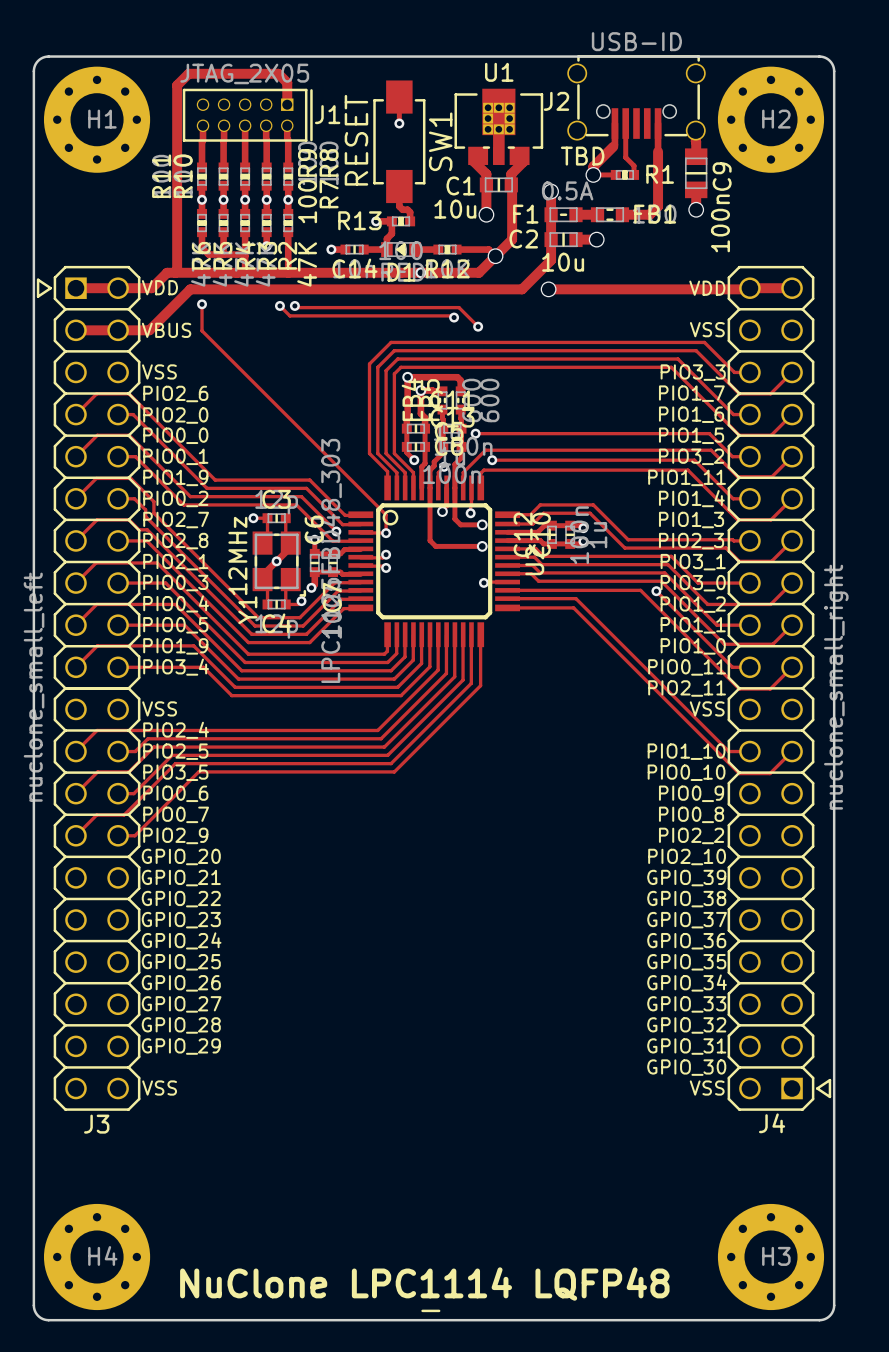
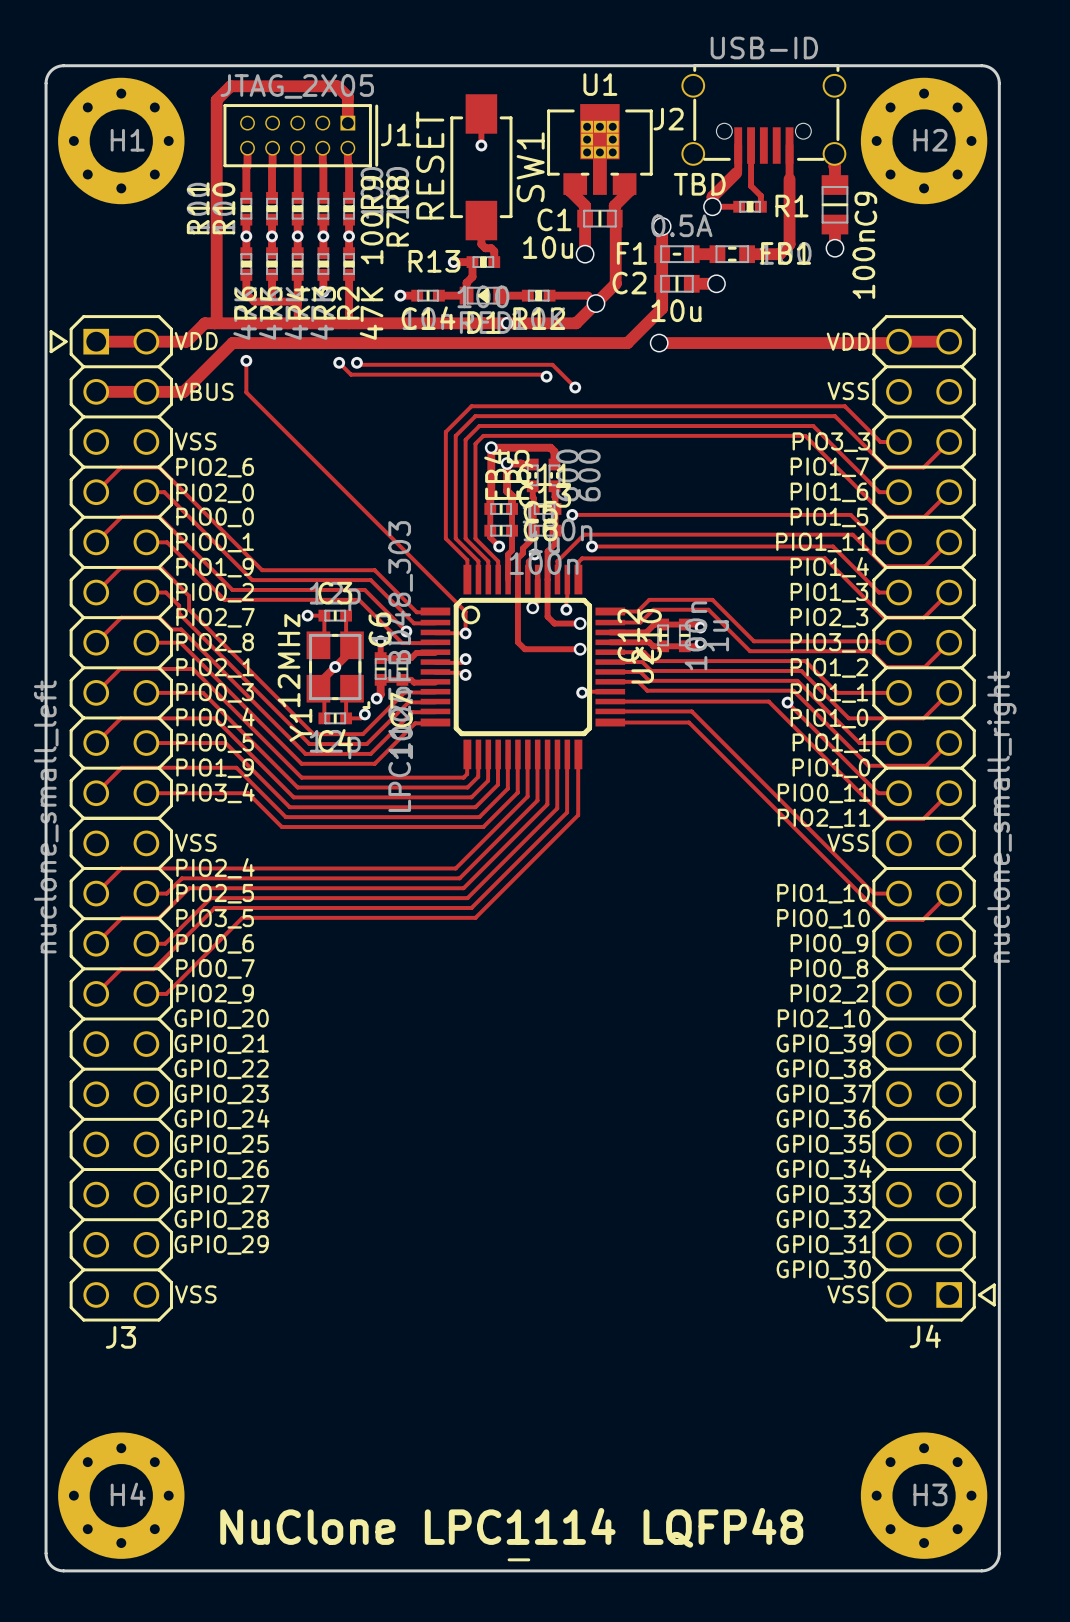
J4 footprint: [727, 265, 832, 1111] -> [872, 315, 996, 1322]

